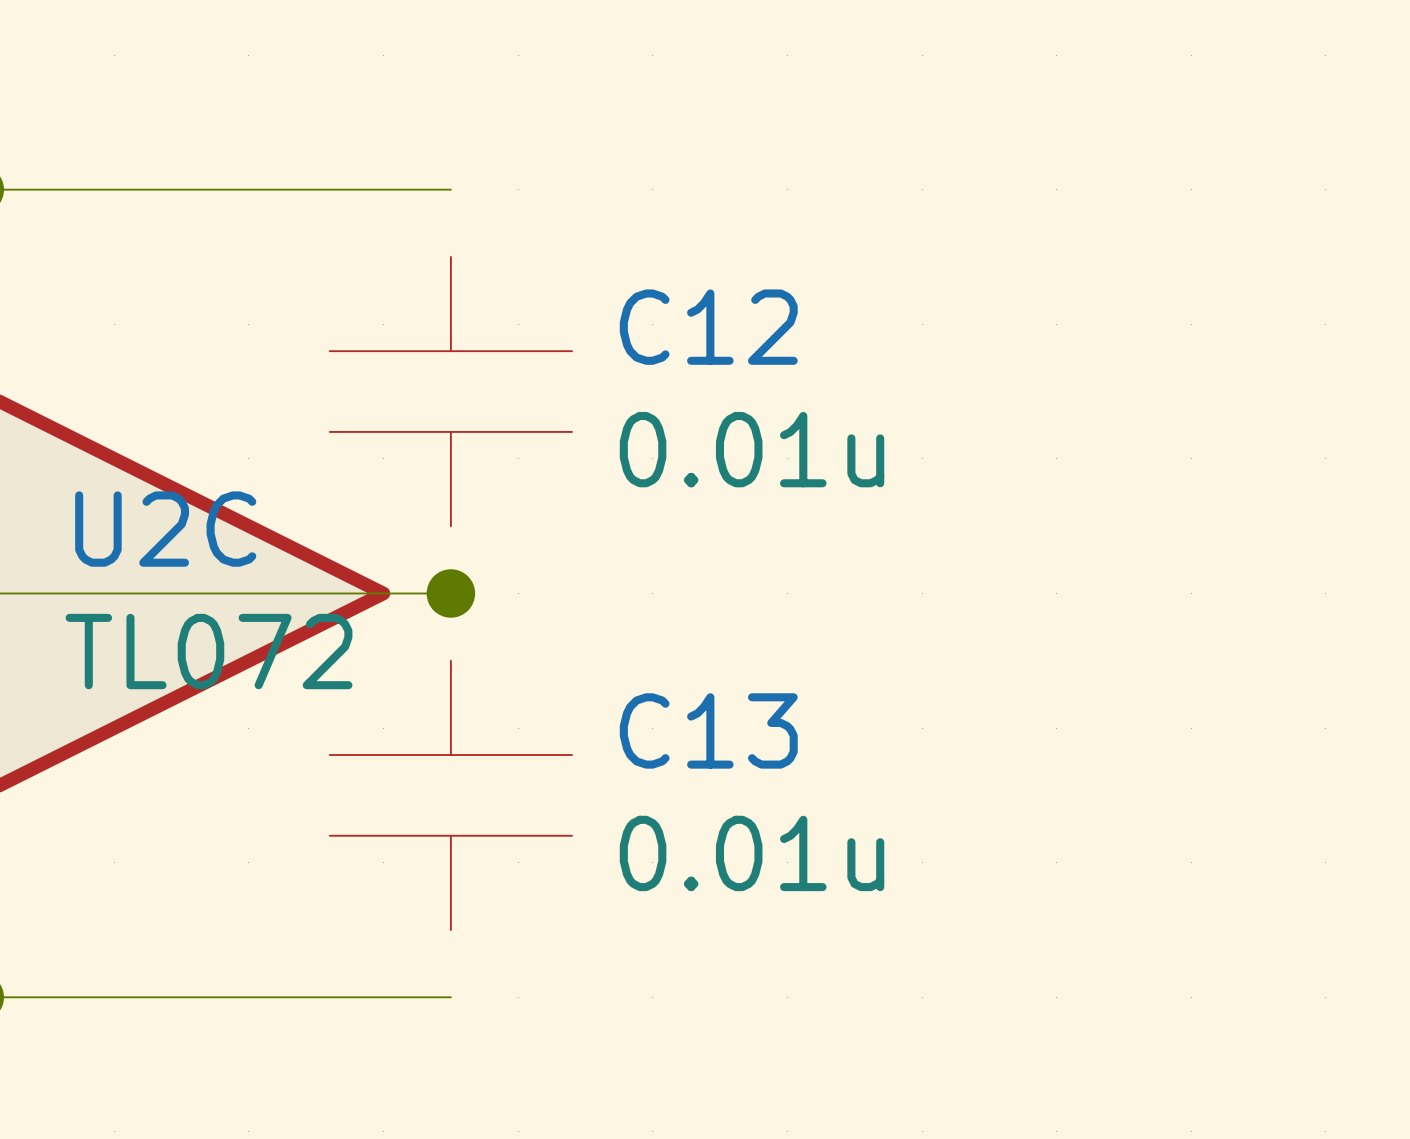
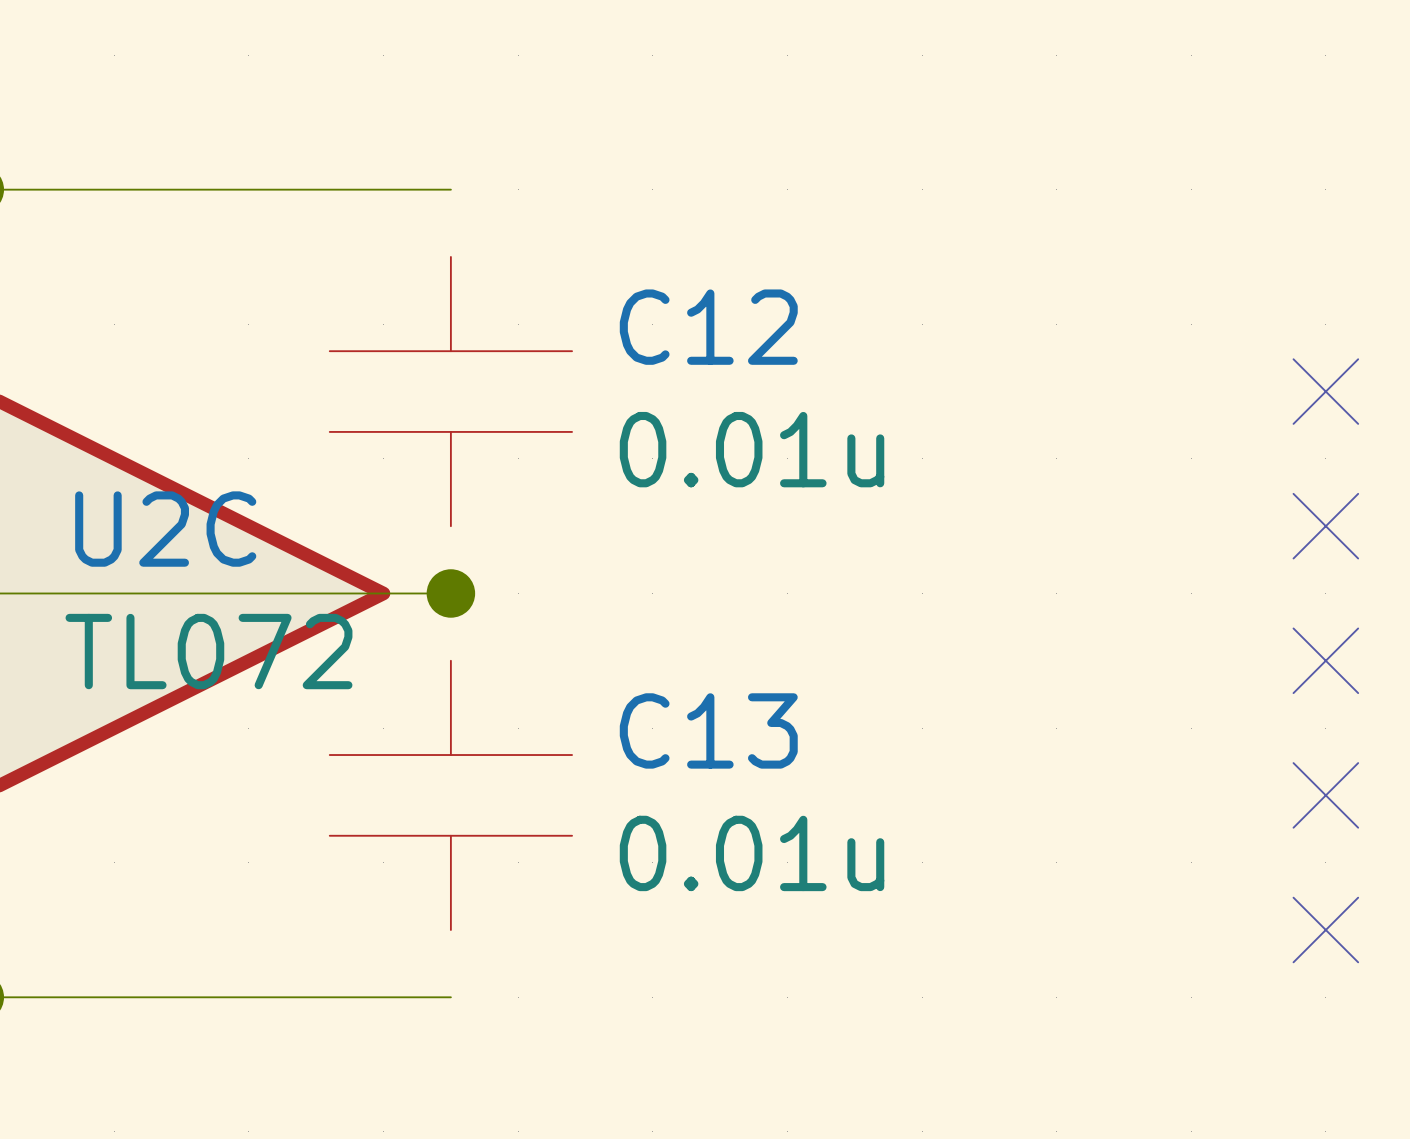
no-connect mark: none -> (1325, 391)
no-connect mark: none -> (1325, 526)
no-connect mark: none -> (1325, 660)
no-connect mark: none -> (1325, 795)
no-connect mark: none -> (1325, 930)

